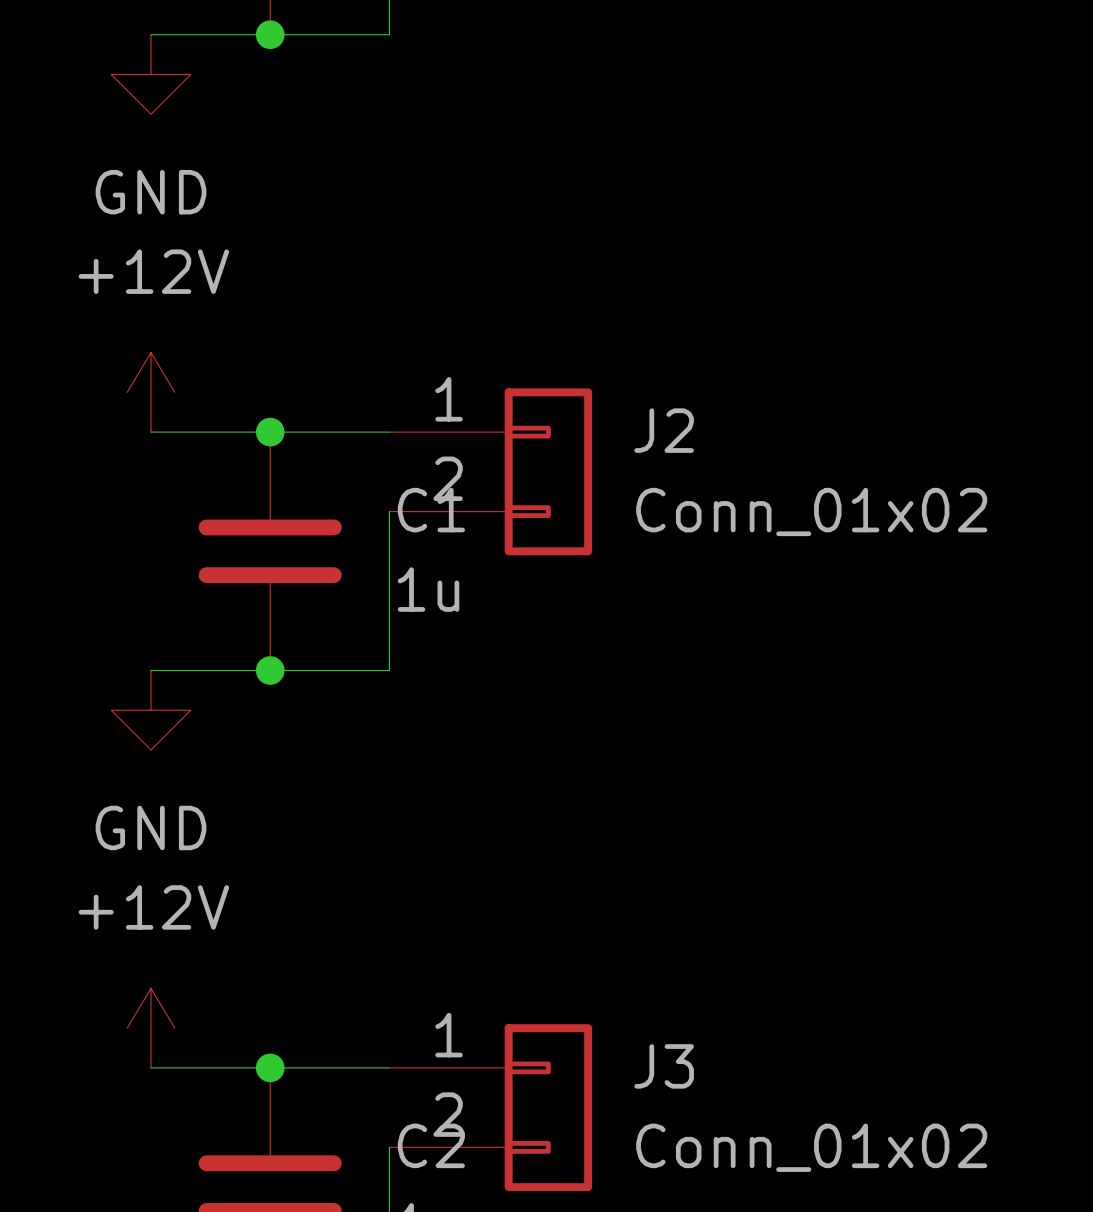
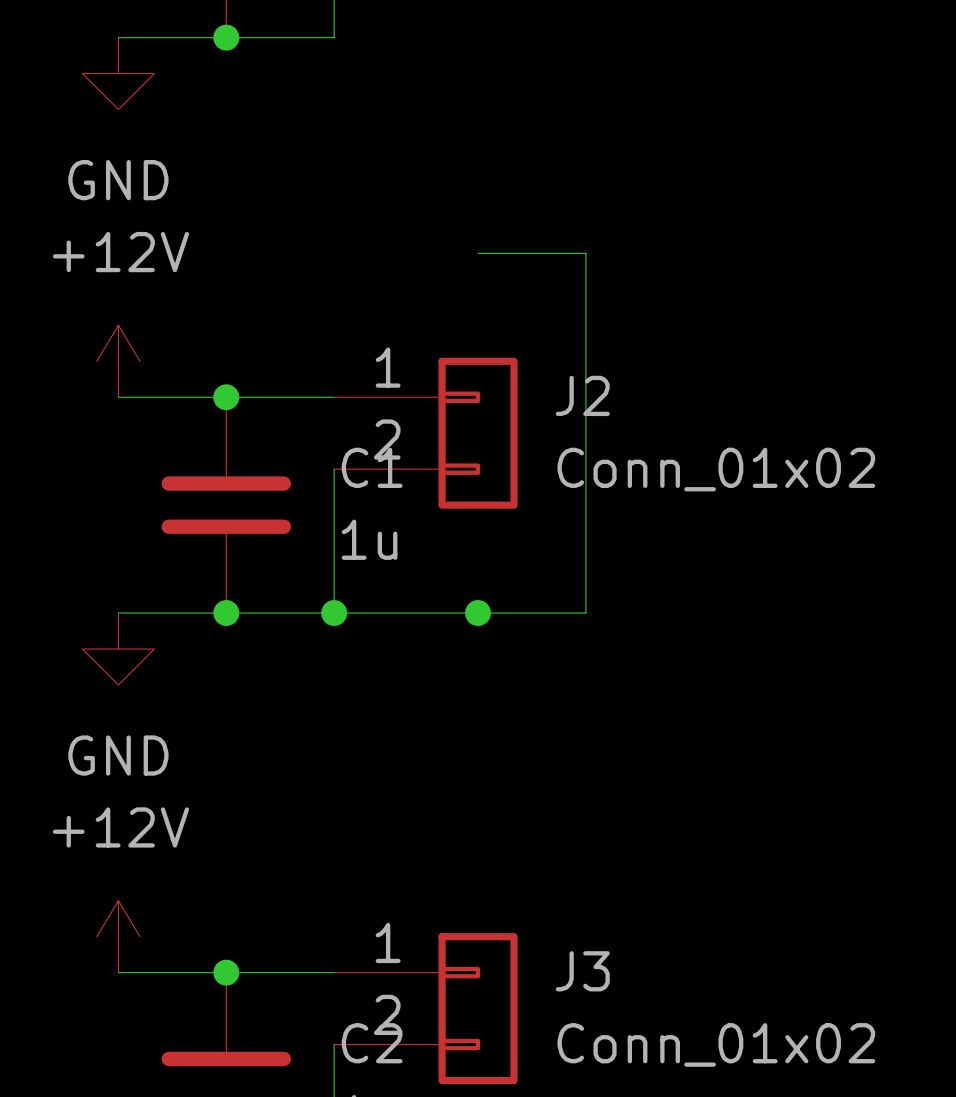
wire: none -> (478, 253) (585, 253) (585, 613) (334, 613)
junction: none -> (334, 613)
junction: none -> (478, 613)

